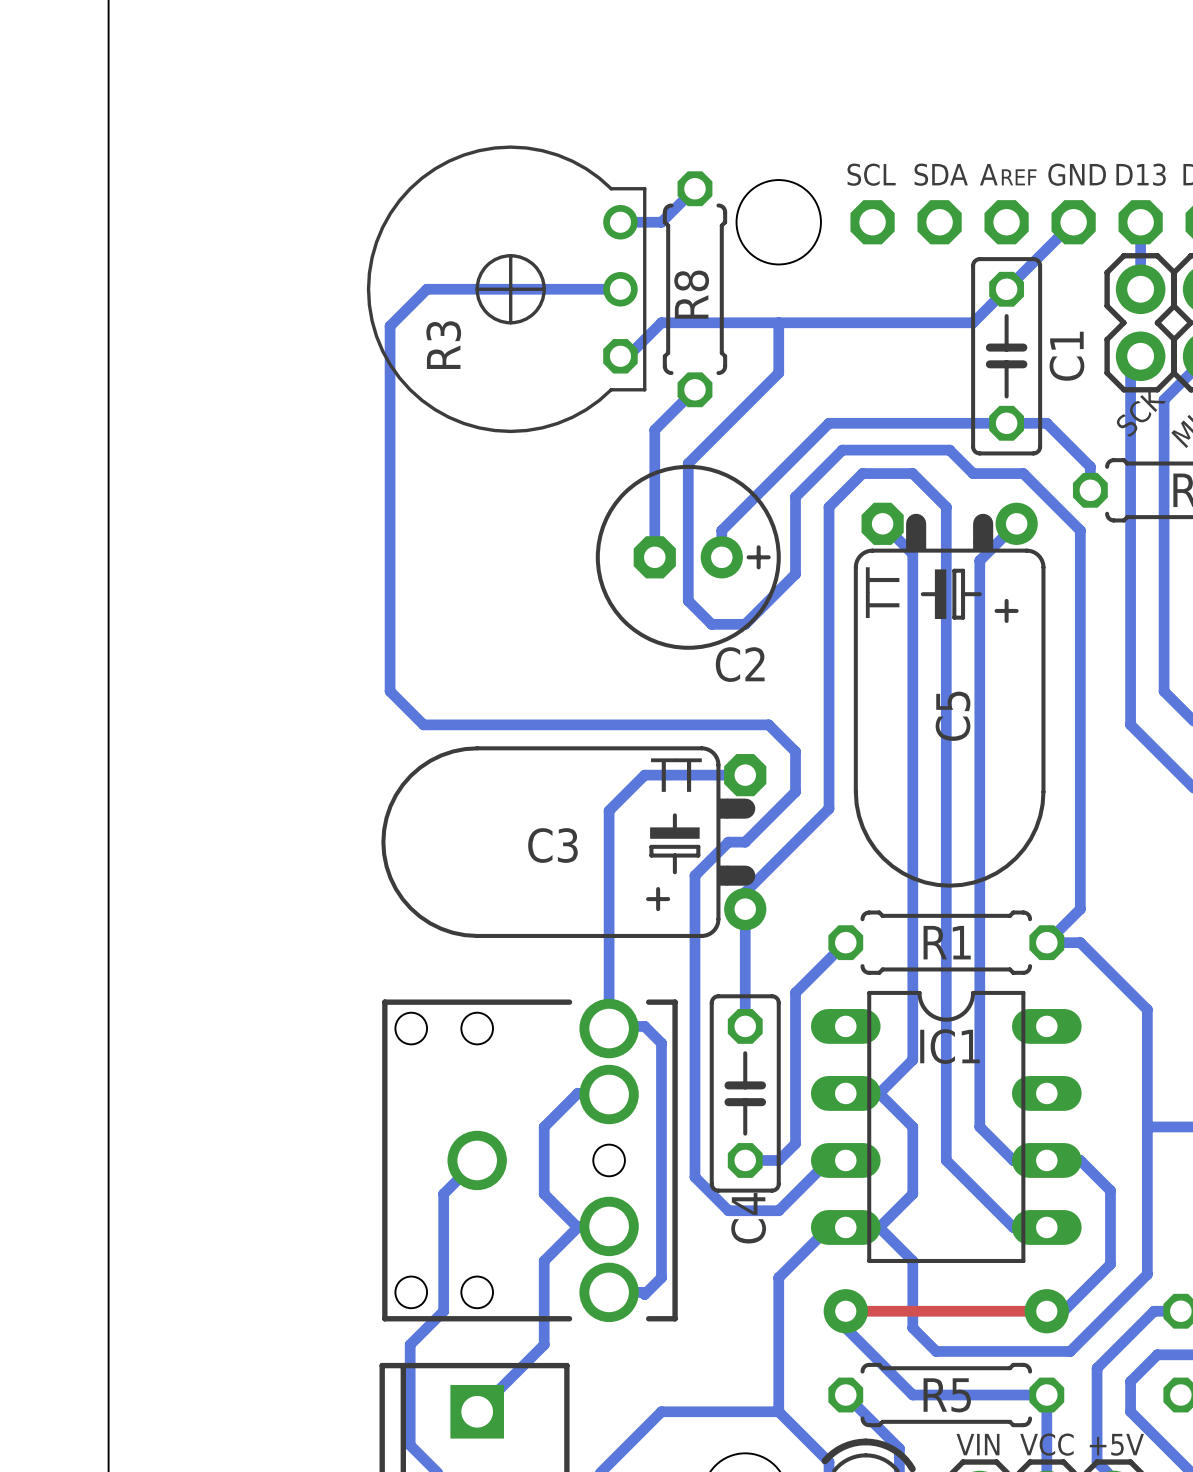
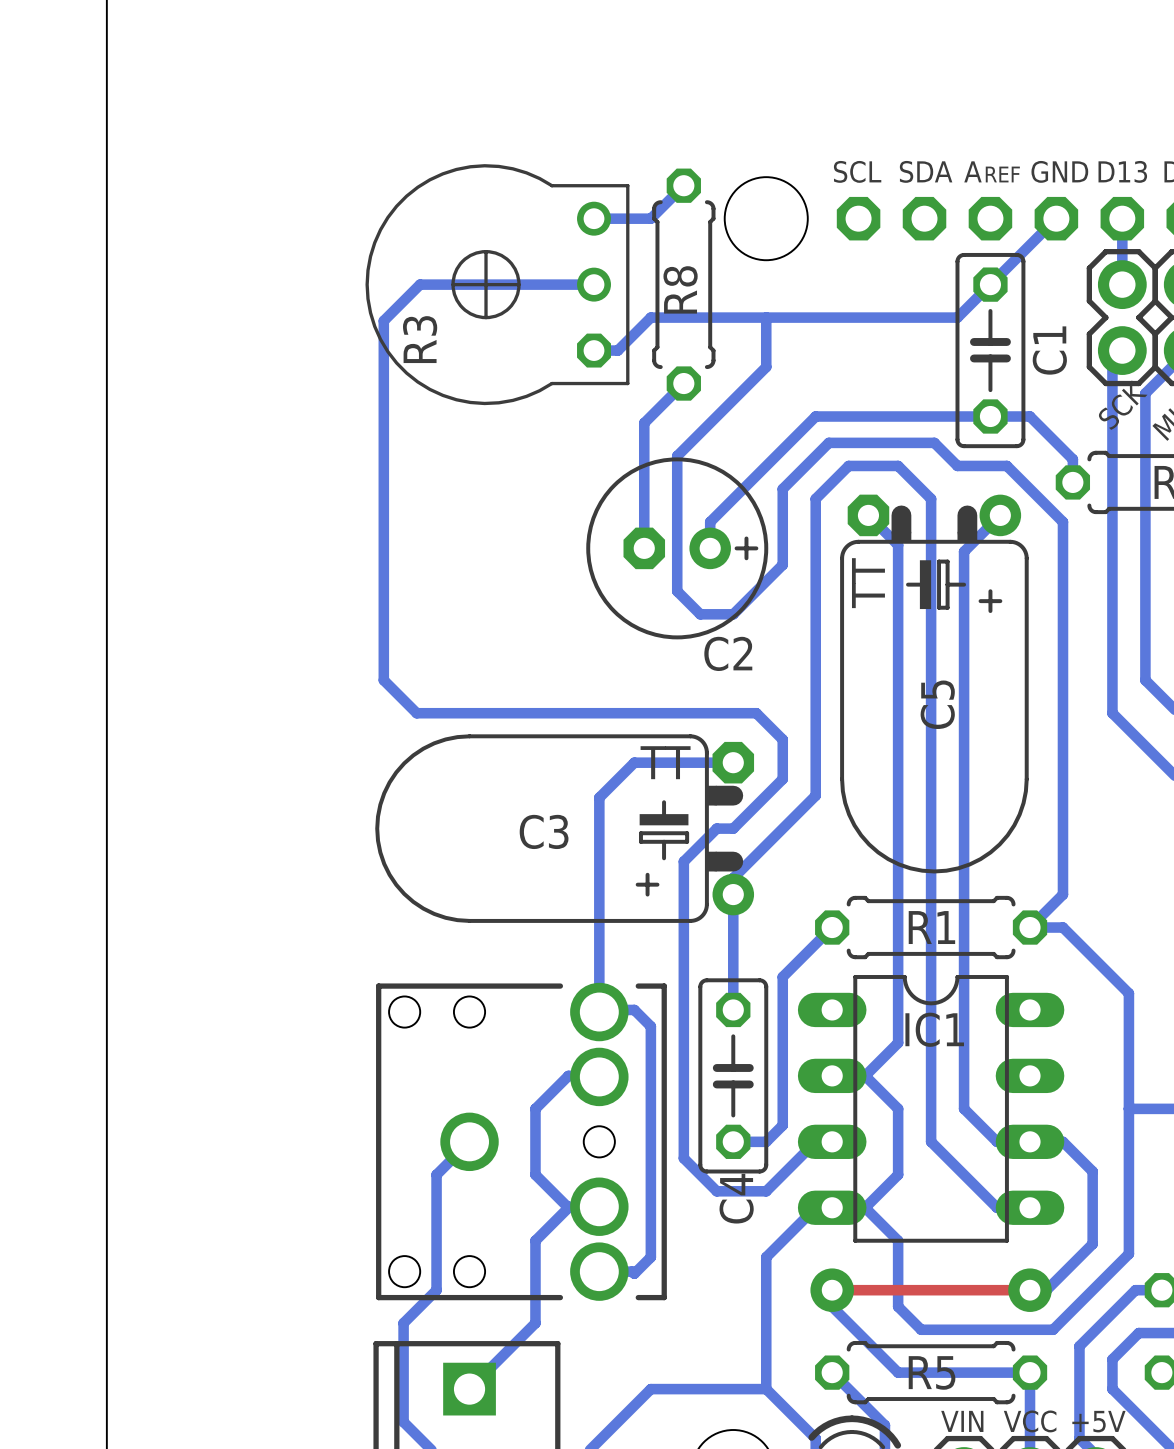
R3 footprint: [366, 145, 647, 434] -> [365, 164, 630, 406]

